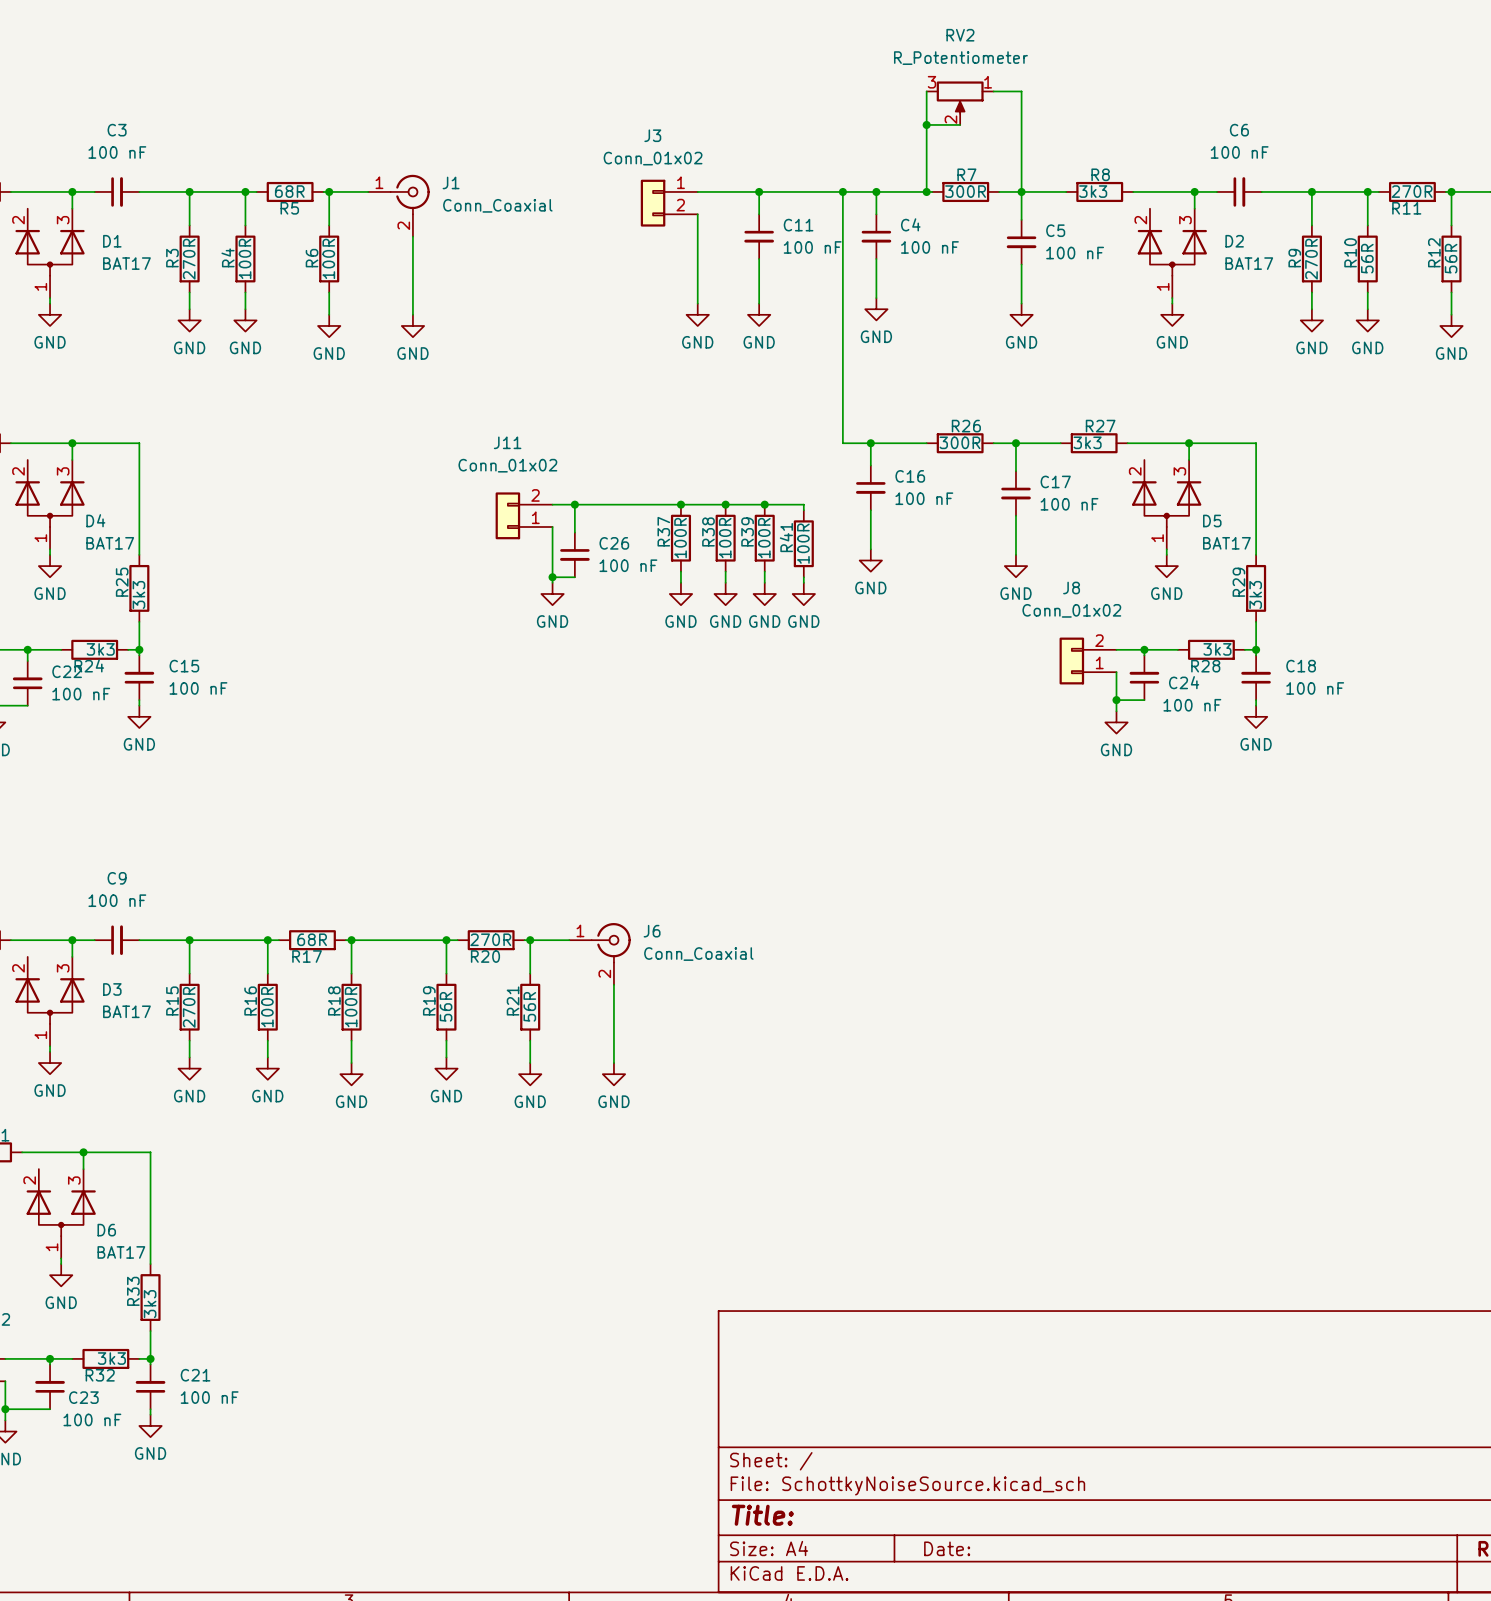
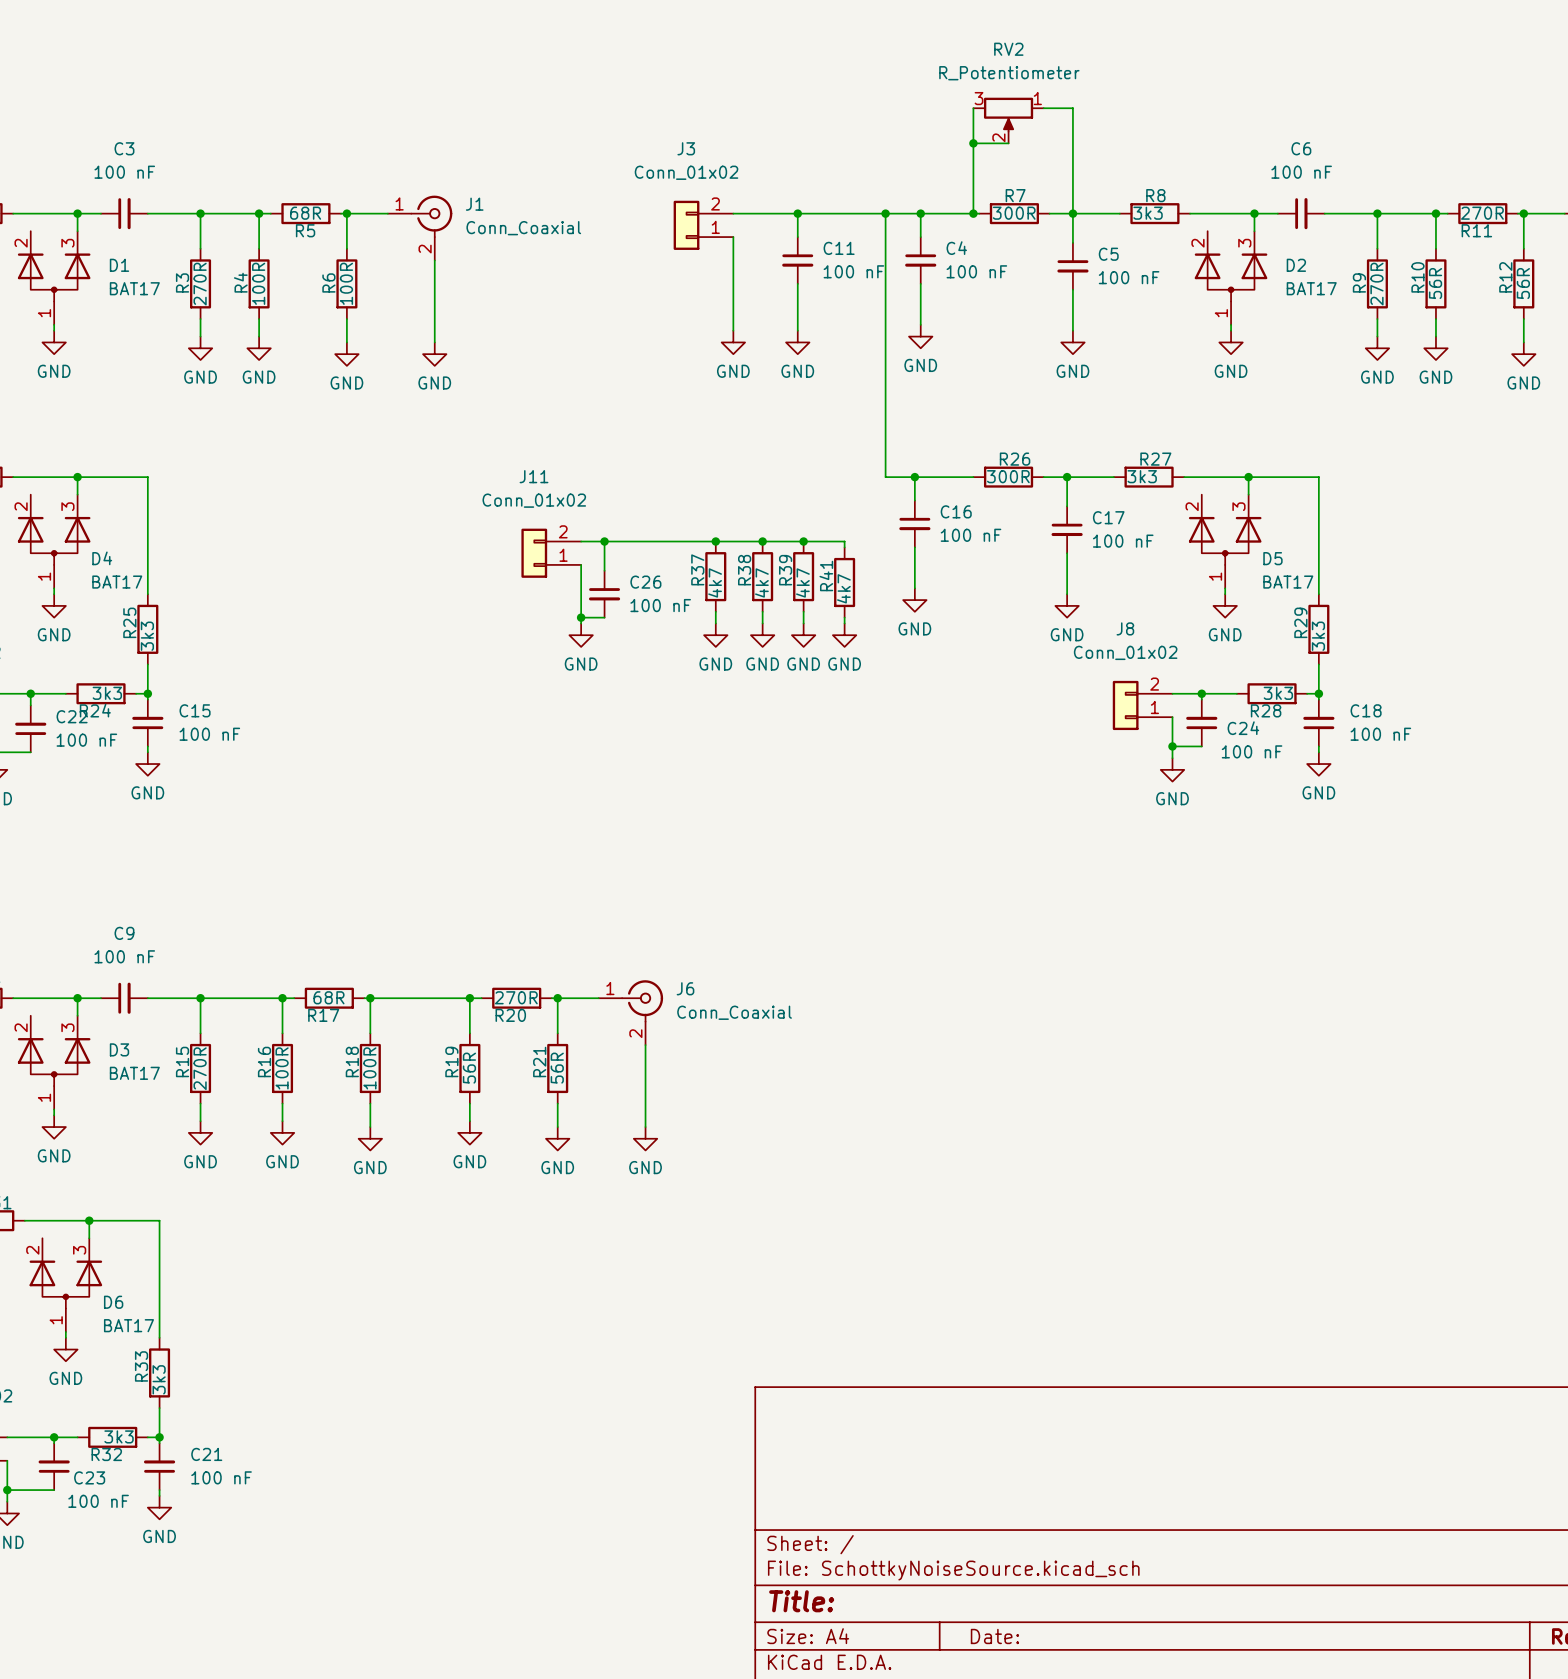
J3 flip: as is (653, 203) -> up-down (686, 225)
R37 value: 100R (680, 538) -> 4k7 (715, 582)
R38 value: 100R (725, 538) -> 4k7 (761, 582)
R39 value: 100R (764, 538) -> 4k7 (802, 582)
R41 value: 100R (803, 543) -> 4k7 (843, 588)

